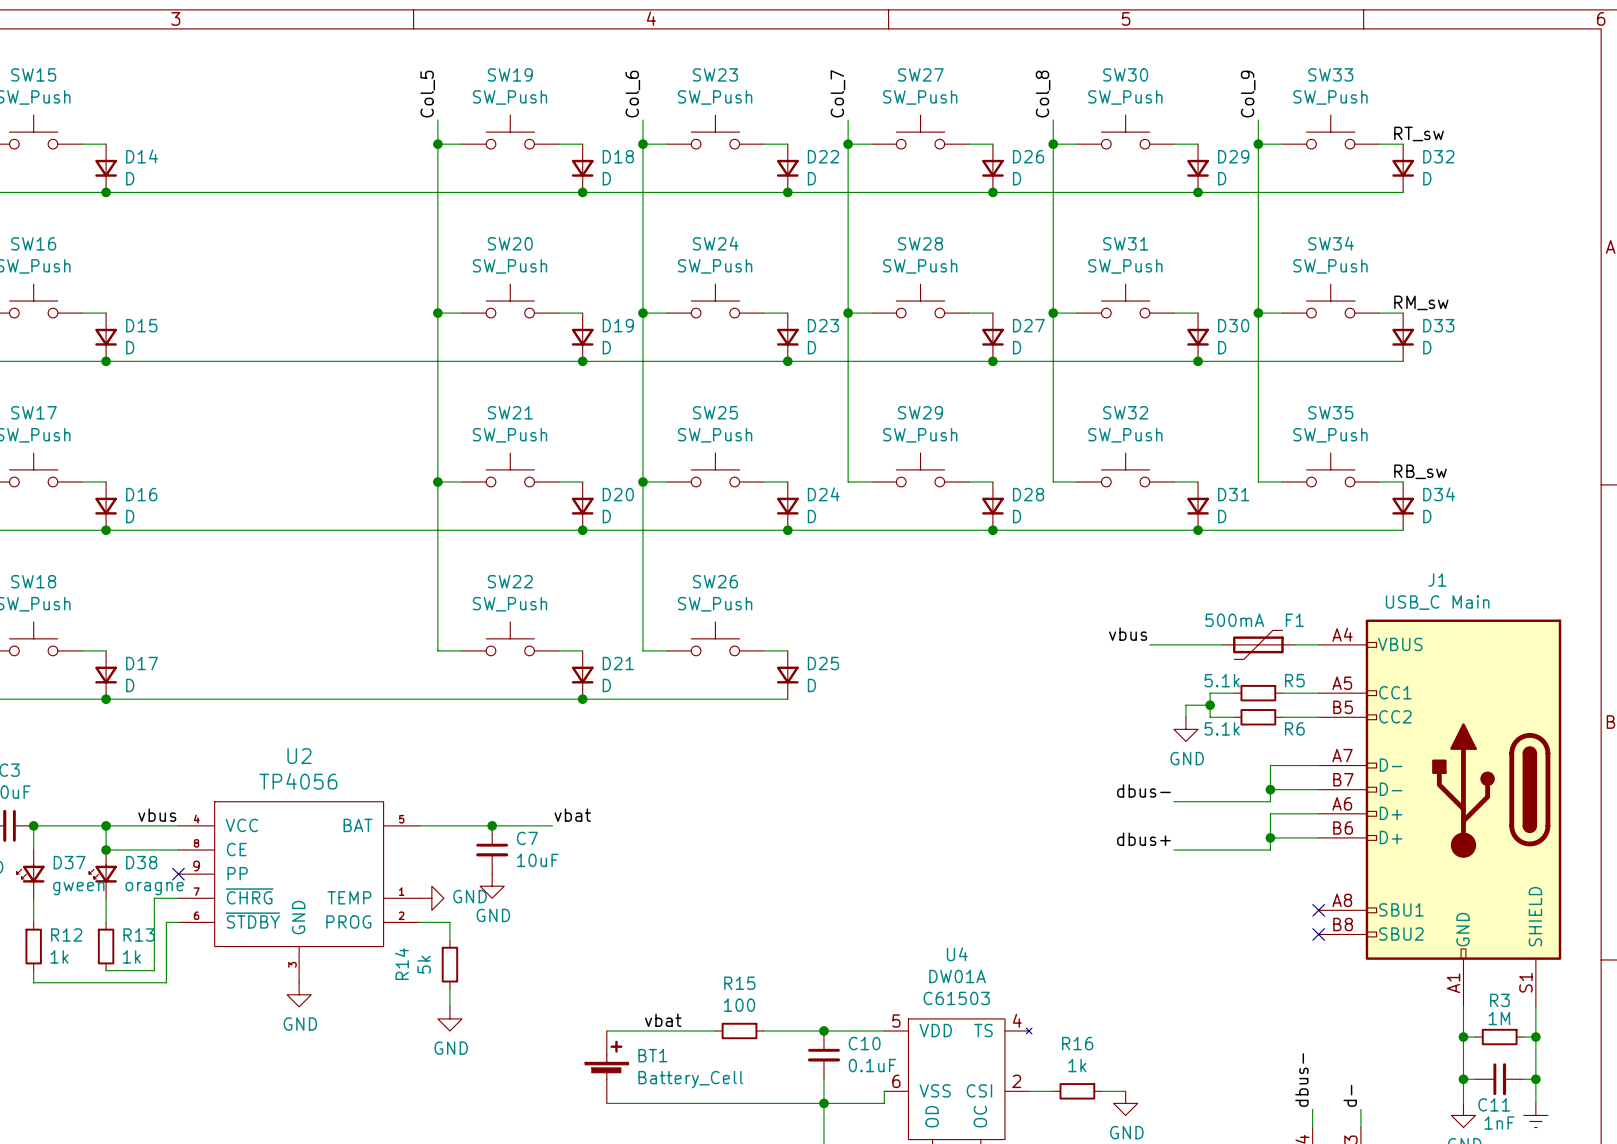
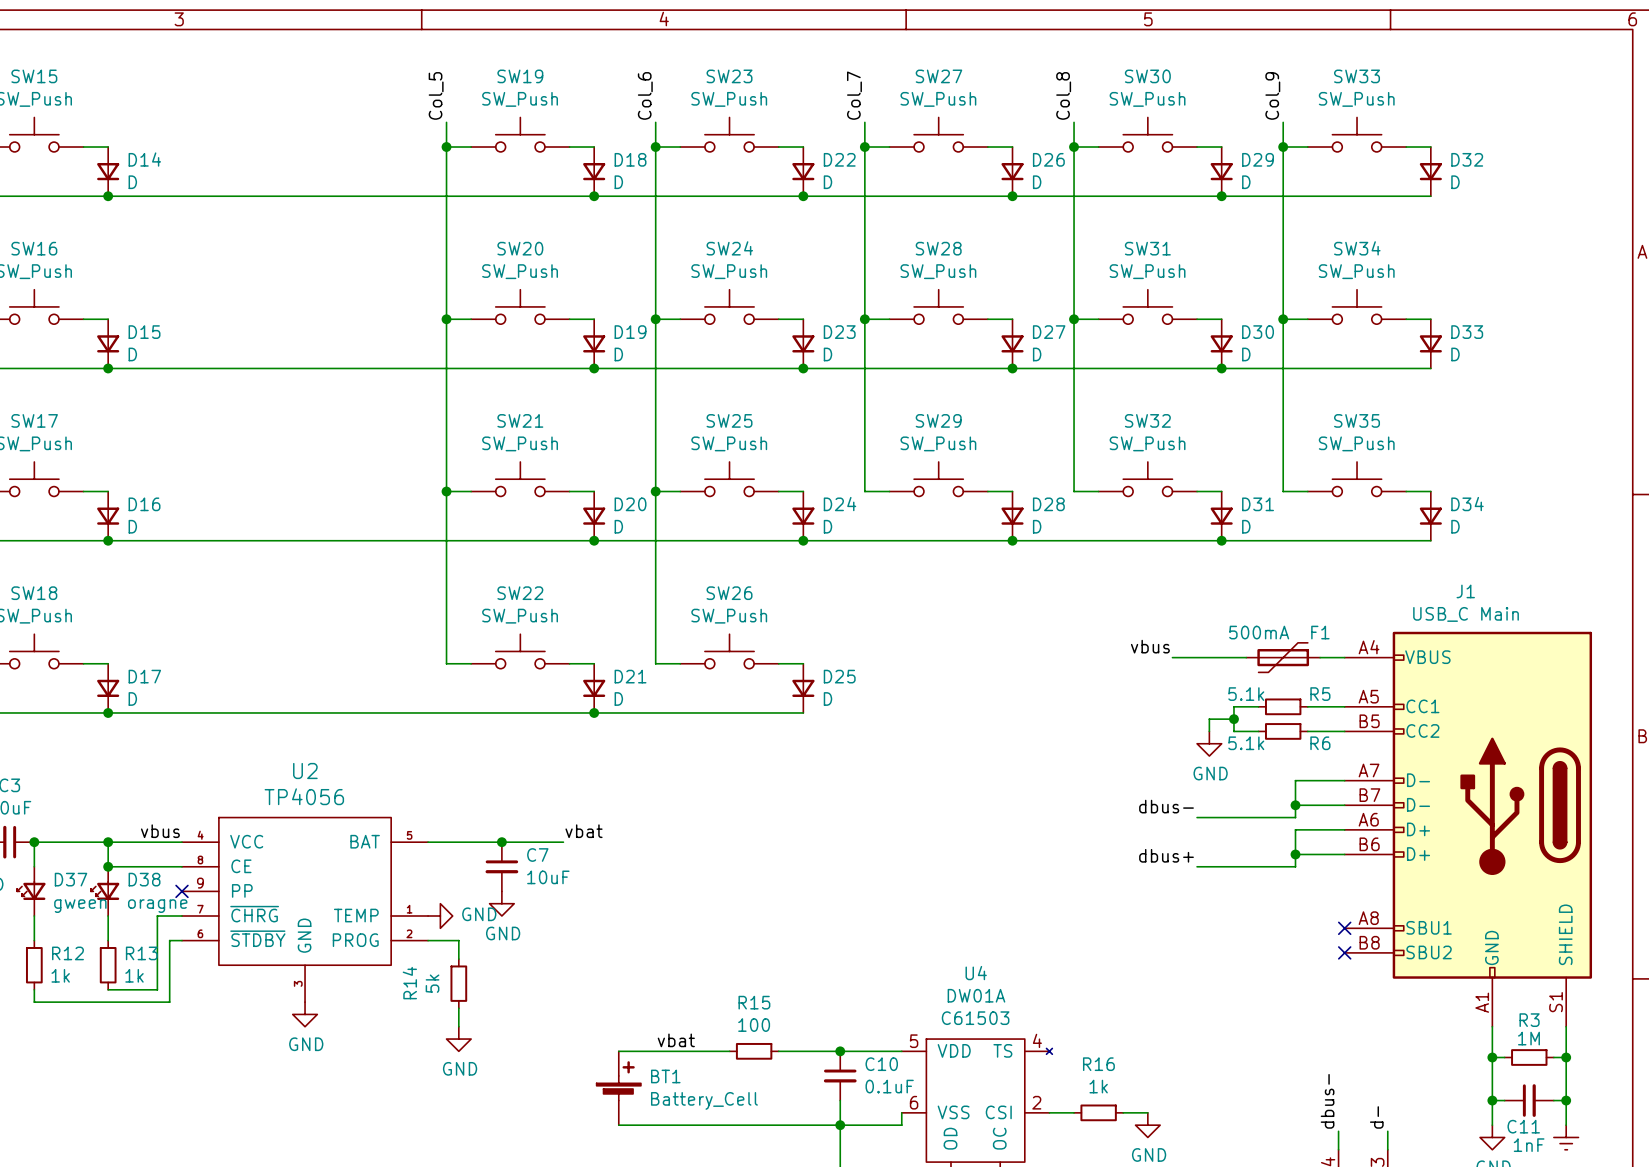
label: RT_sw (1419, 133) -> none
label: RM_sw (1421, 302) -> none
label: RB_sw (1420, 471) -> none

